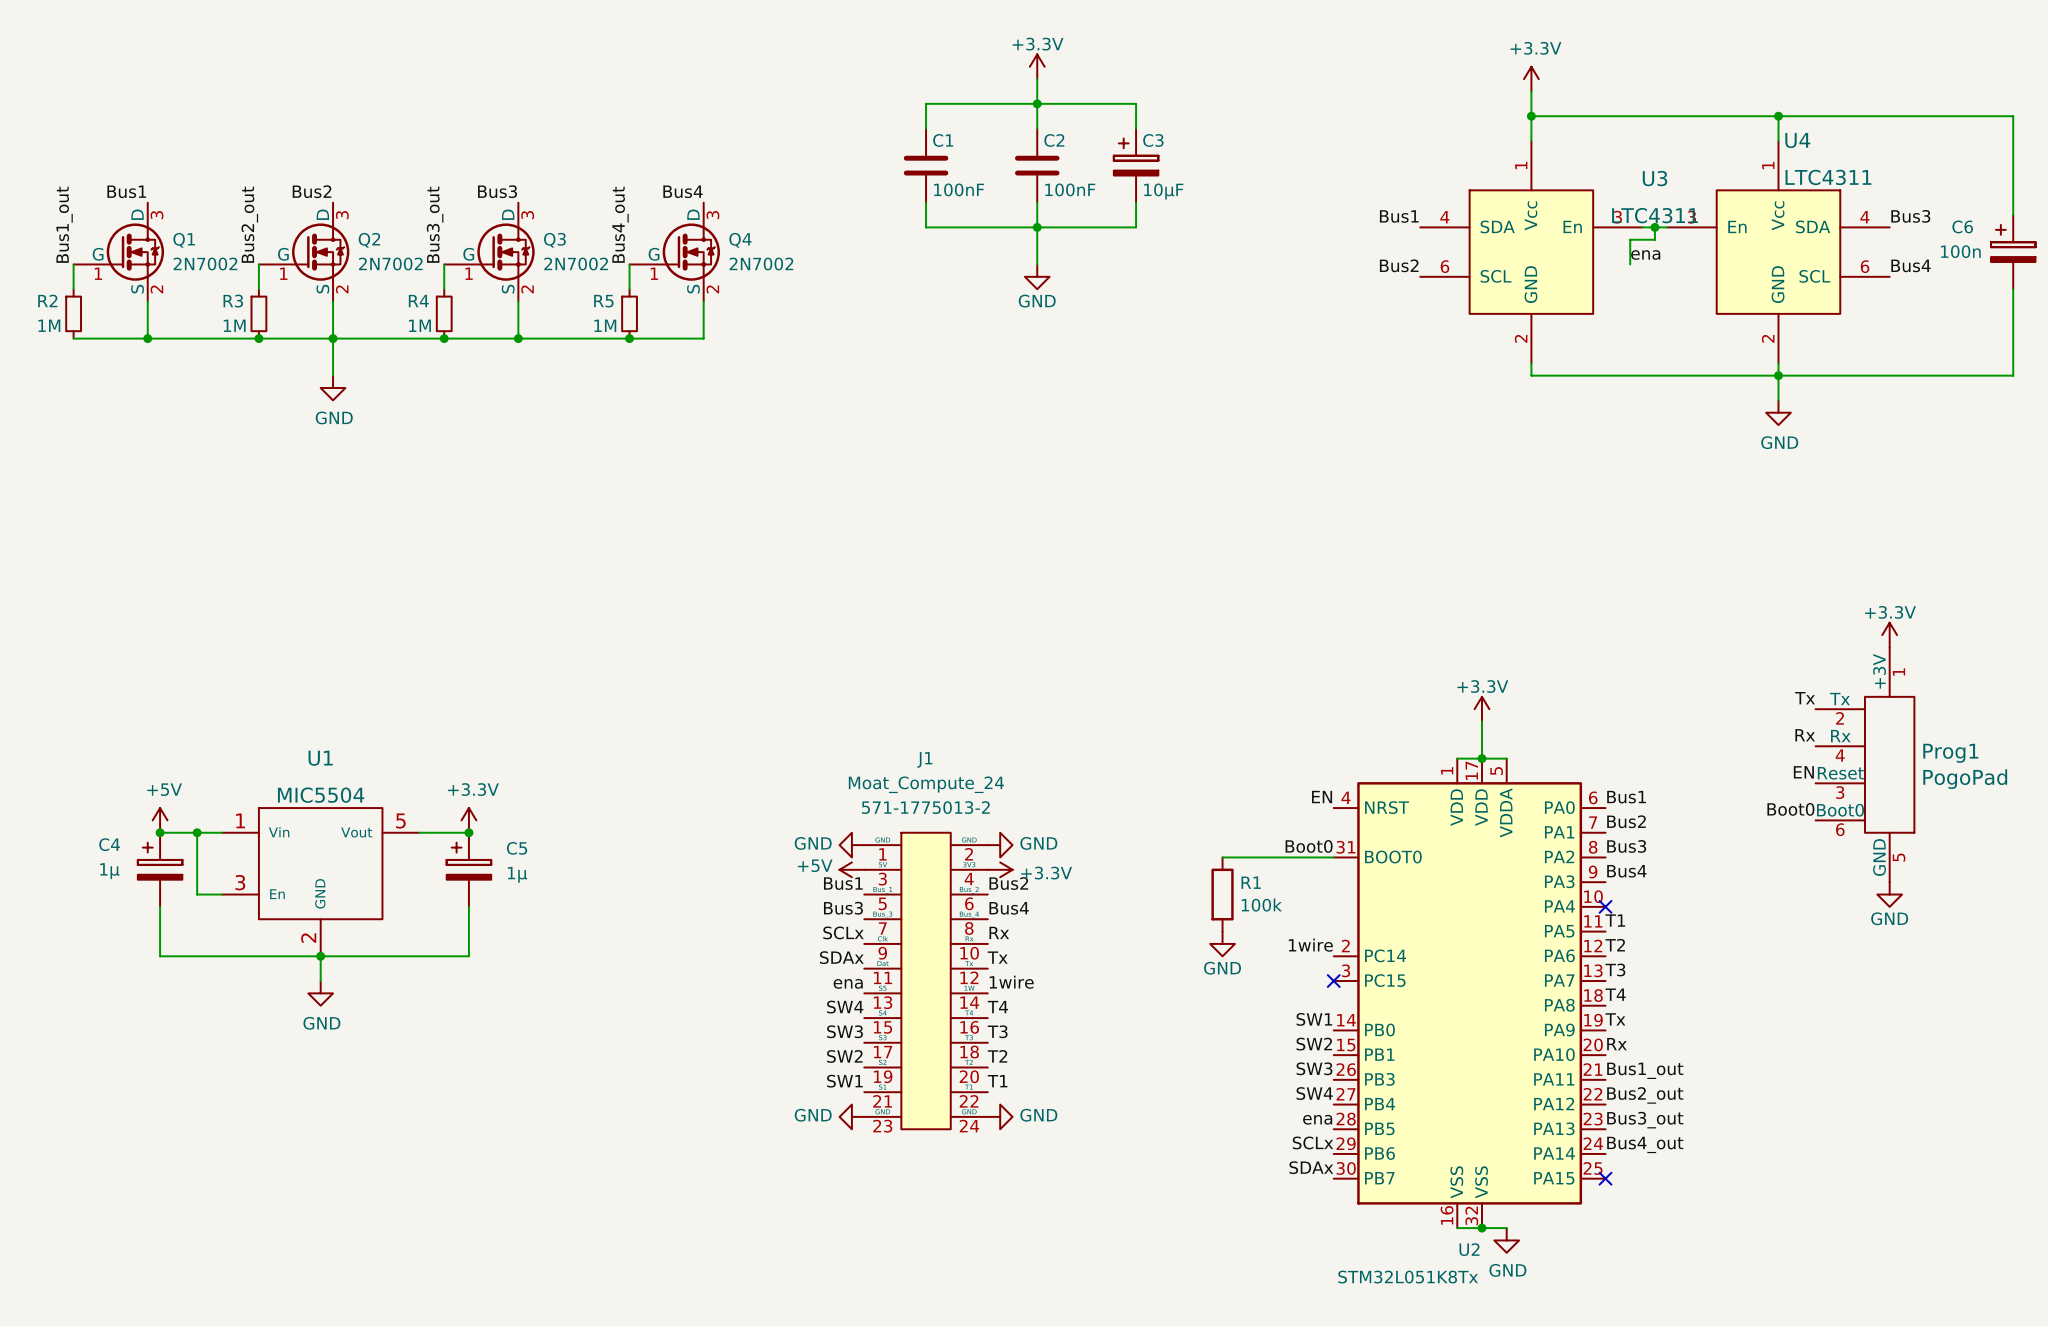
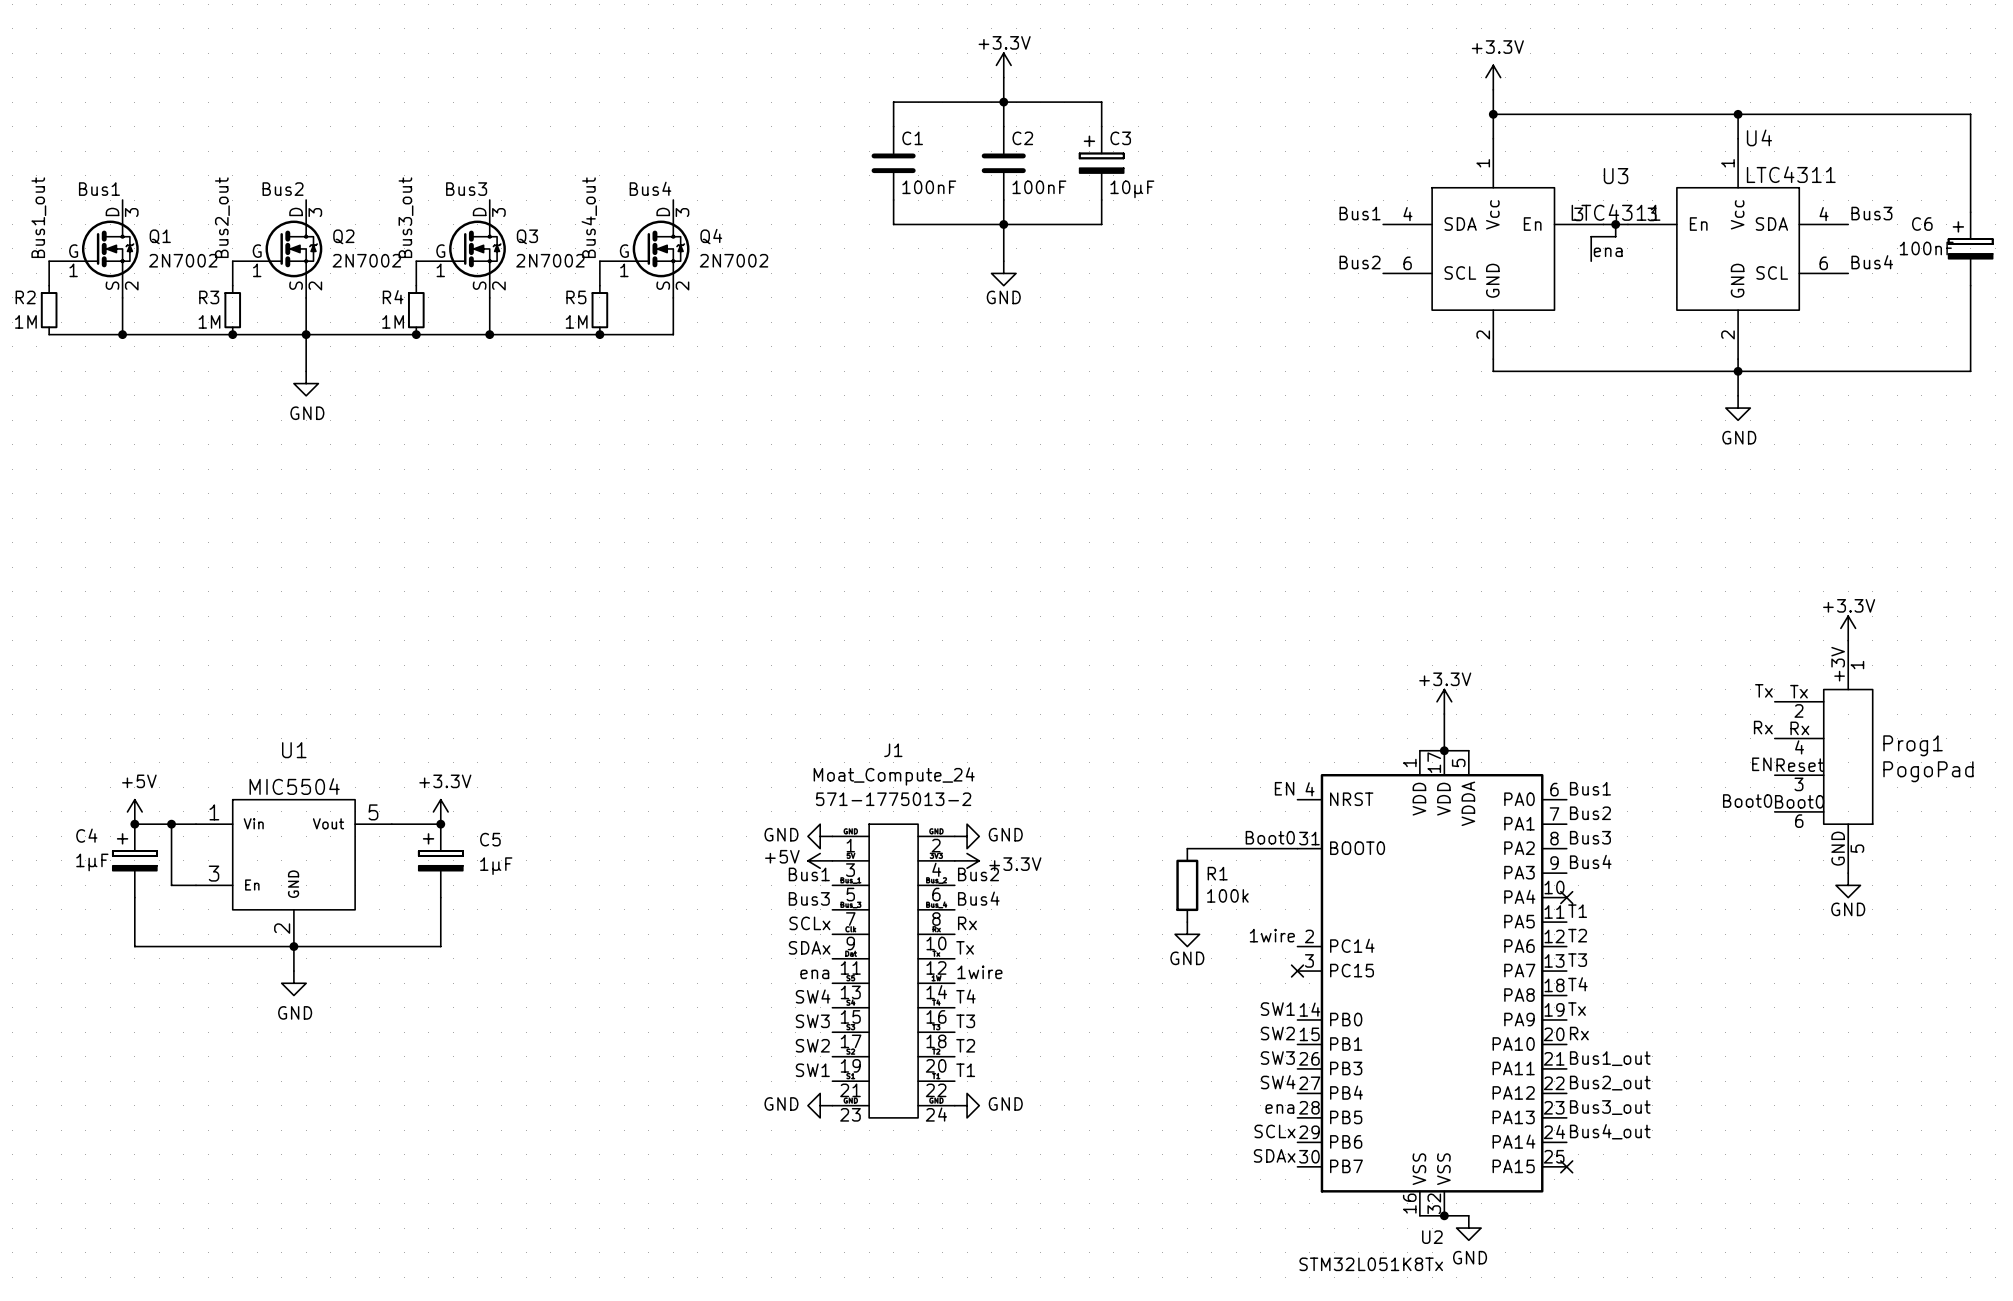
C6 value: 100n (1960, 251) -> 100nF (1926, 248)
C4 value: 1µ (109, 871) -> 1µF (92, 862)
C5 value: 1µ (517, 874) -> 1µF (496, 866)

